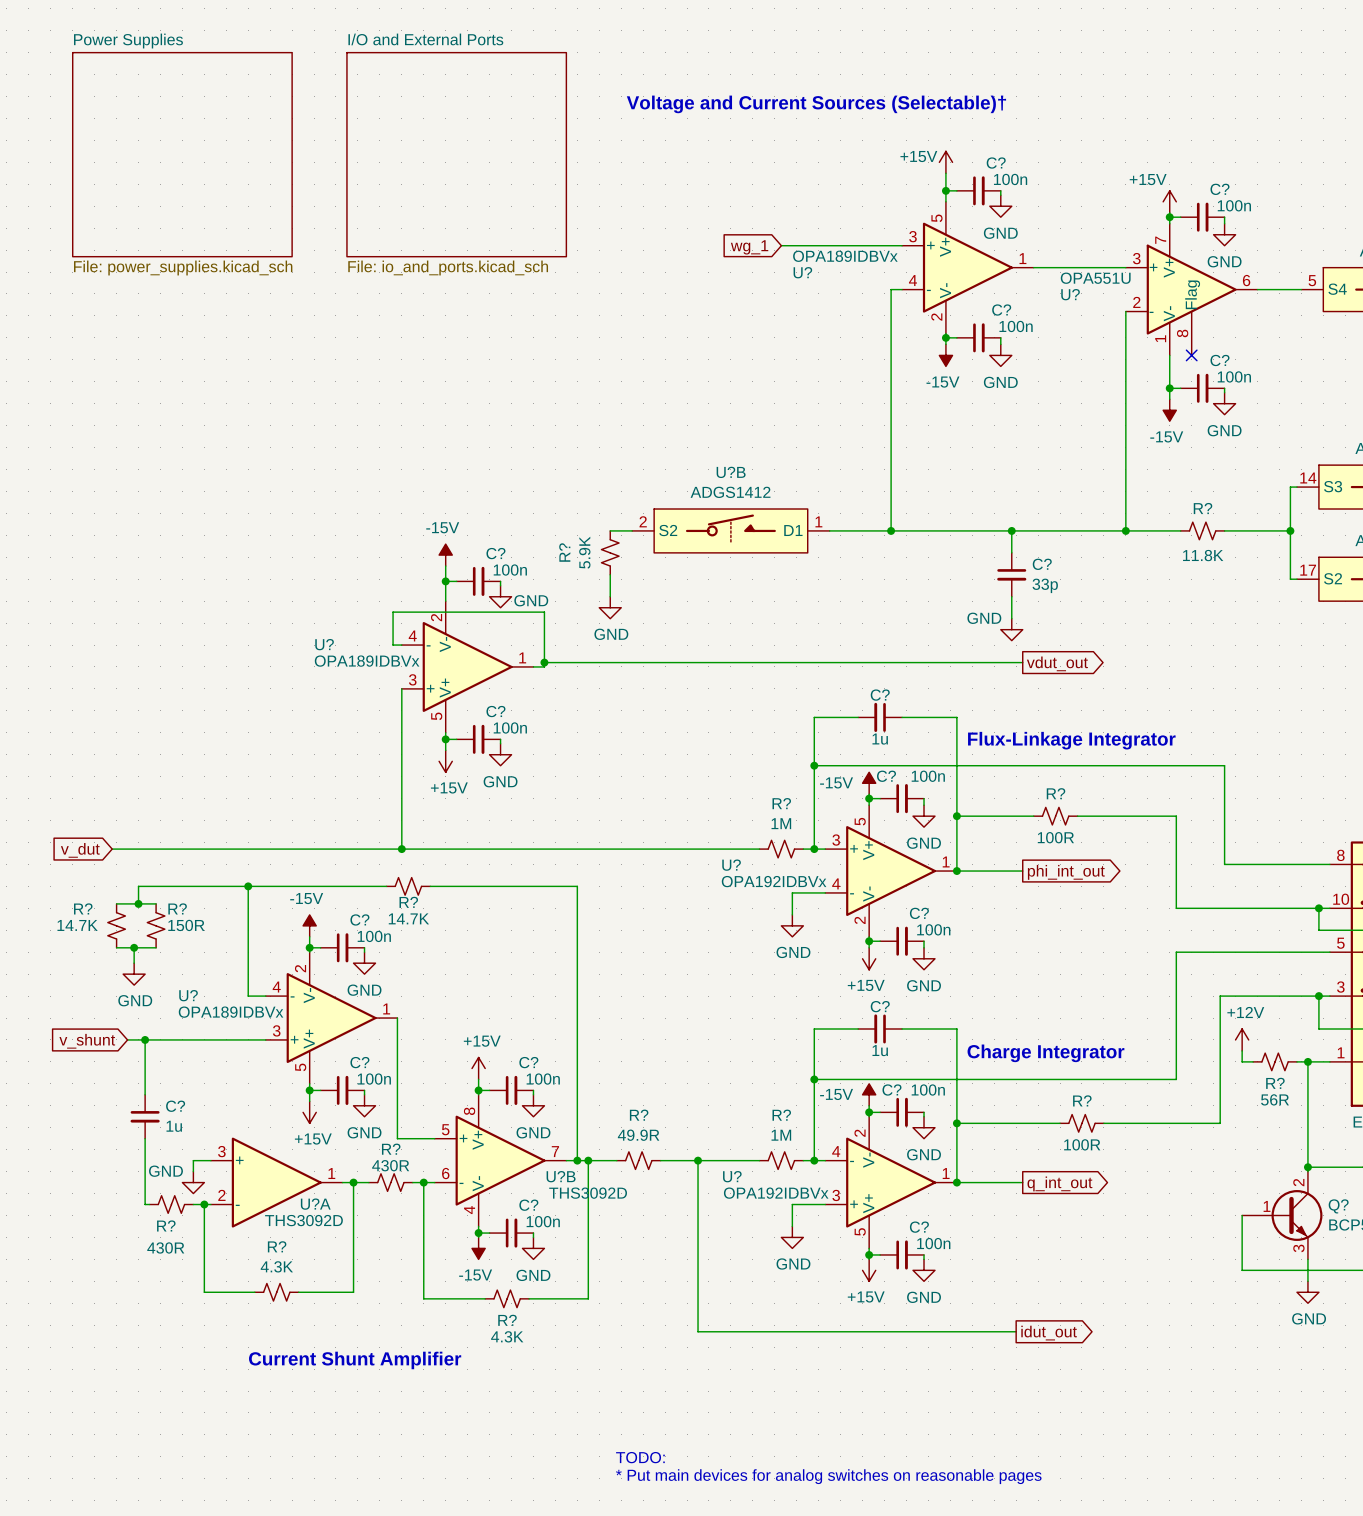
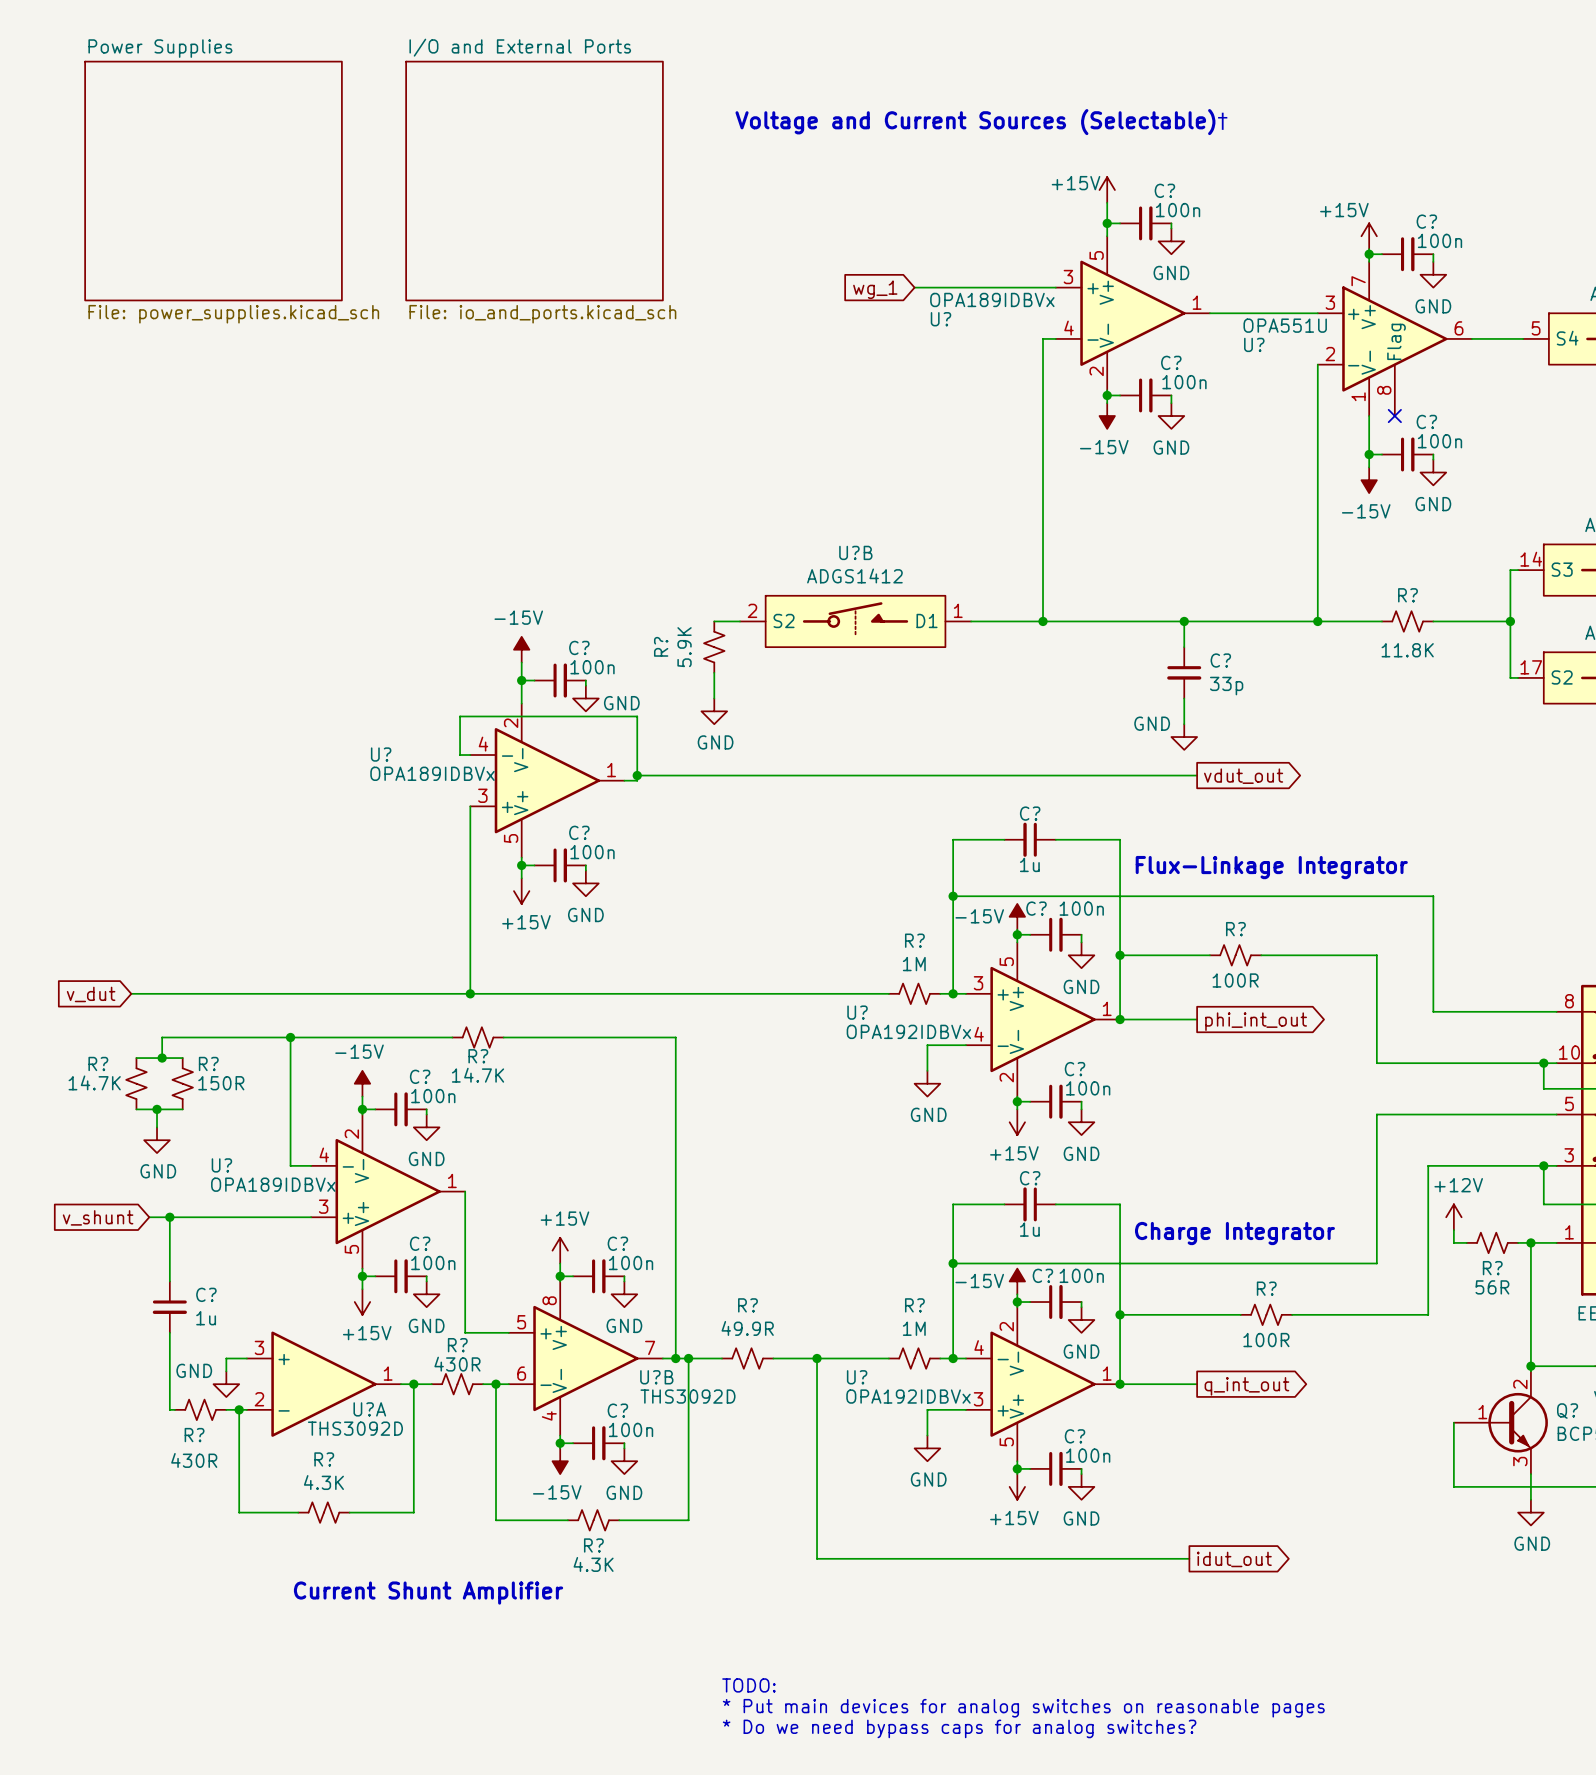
text: none -> TODO: (748, 1685)
text: TODO: (640, 1457) -> * Put main devices for analog switches on reasonable pages (1023, 1708)
text: * Put main devices for analog switches on reasonable pages (828, 1476) -> * Do we need bypass caps for analog switches? (959, 1728)

